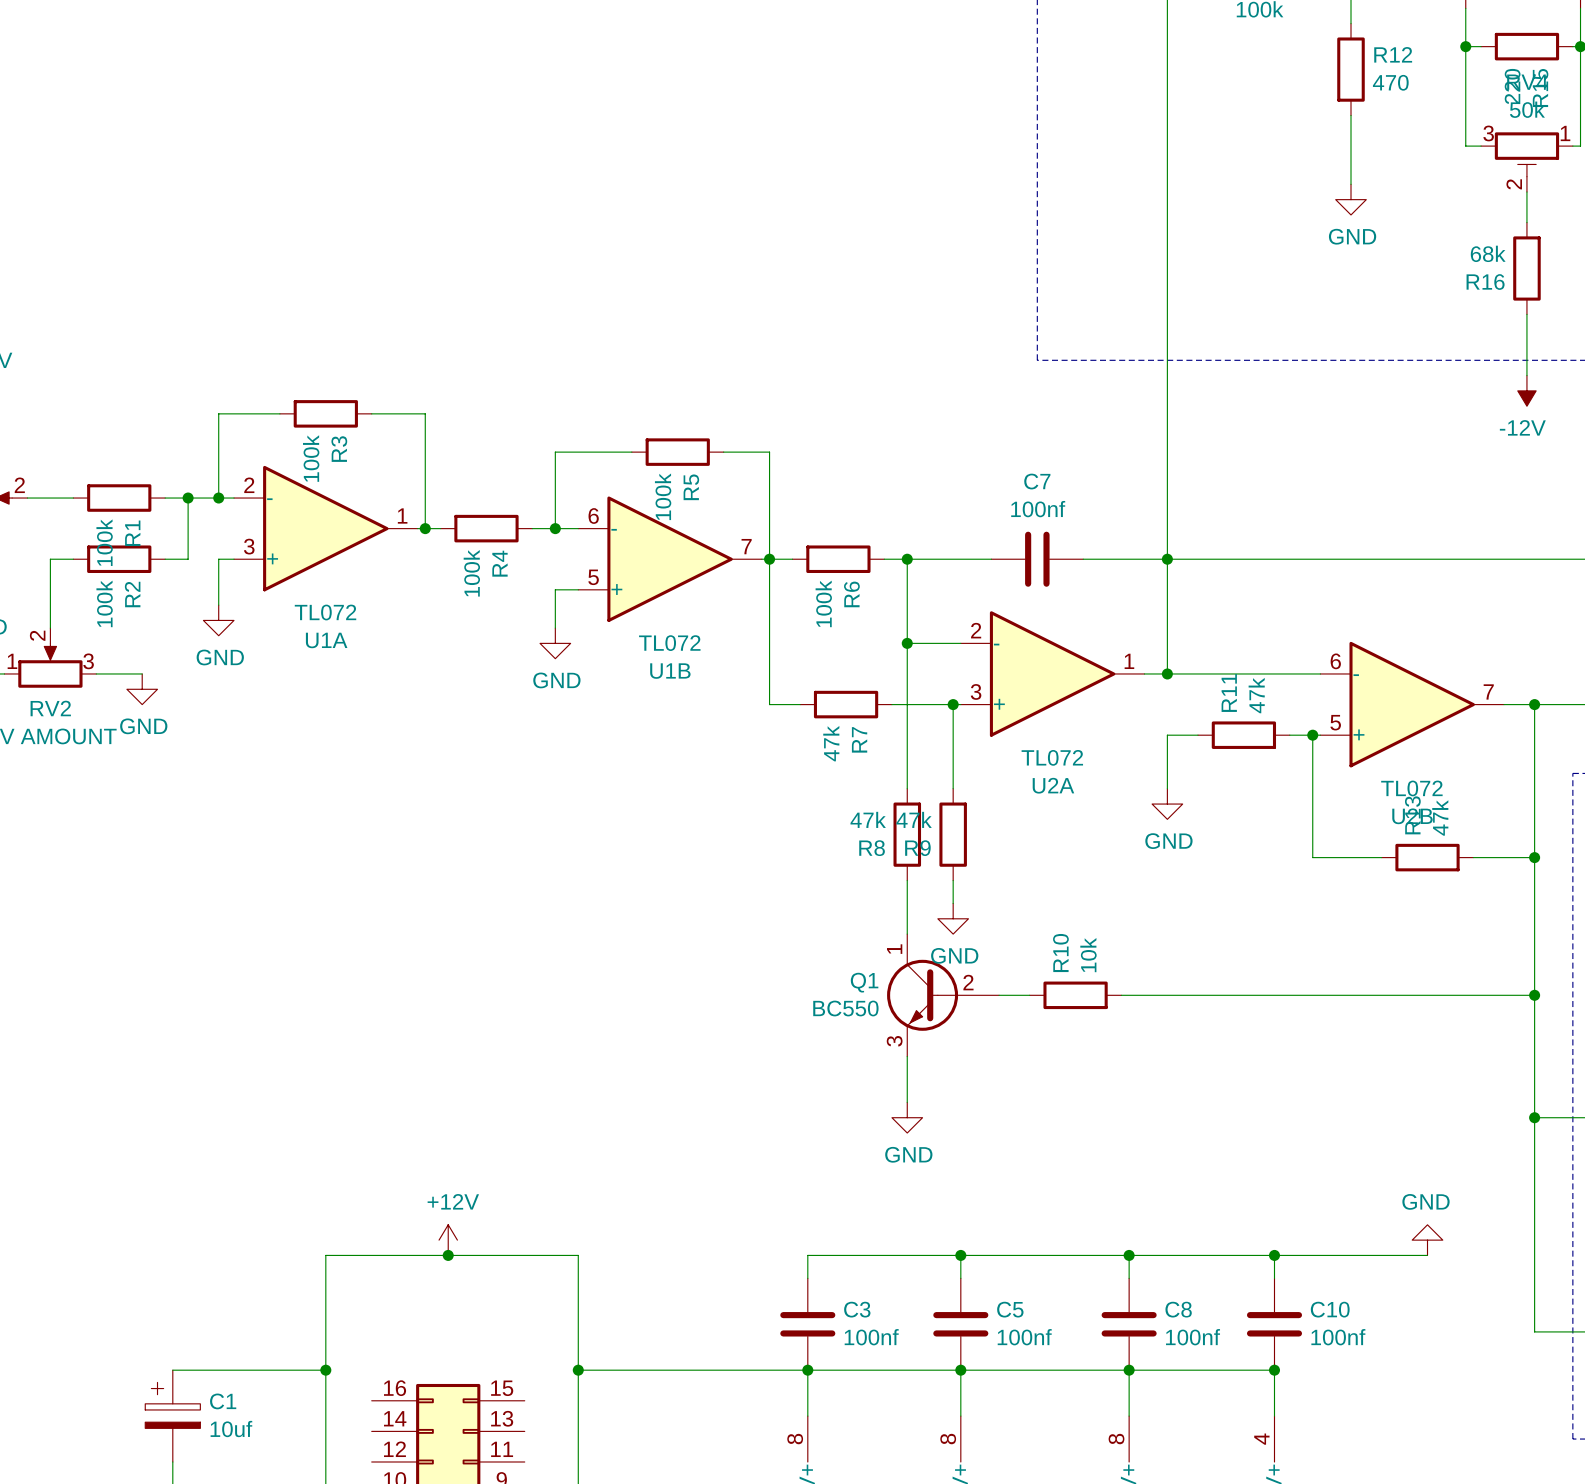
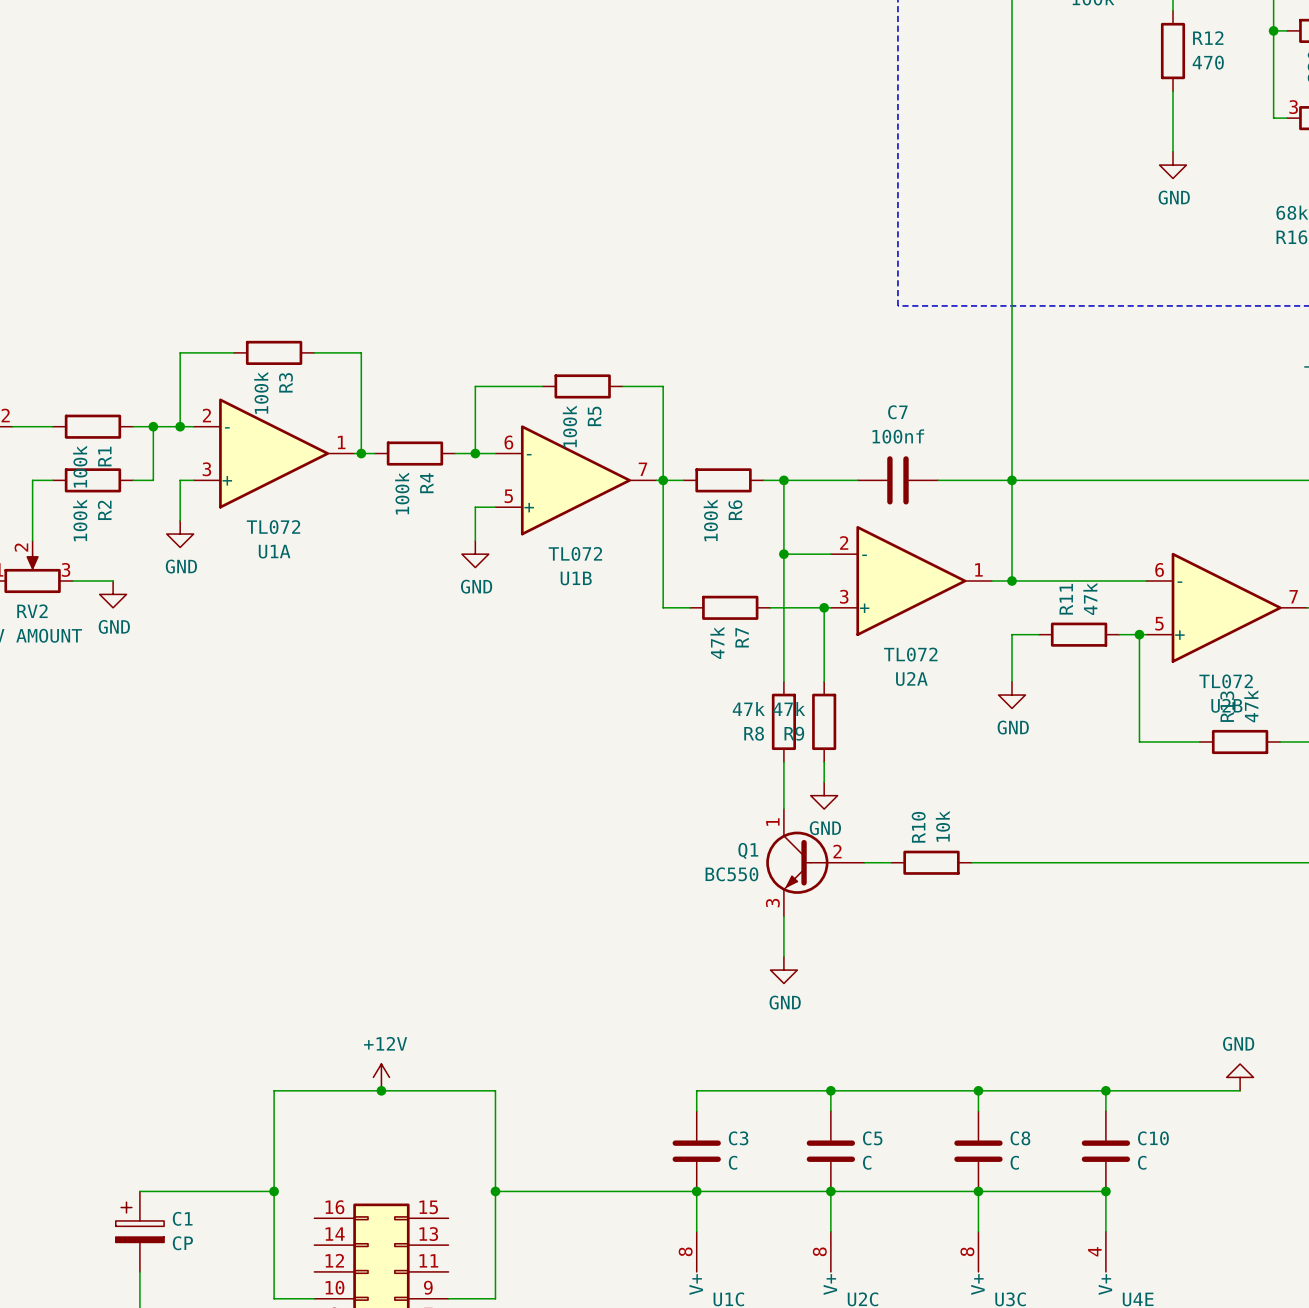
C3 value: 100nf (871, 1337) -> C (733, 1162)
C5 value: 100nf (1024, 1337) -> C (867, 1162)
C8 value: 100nf (1193, 1337) -> C (1014, 1162)
C10 value: 100nf (1338, 1337) -> C (1142, 1162)
C1 value: 10uf (231, 1429) -> CP (182, 1243)

